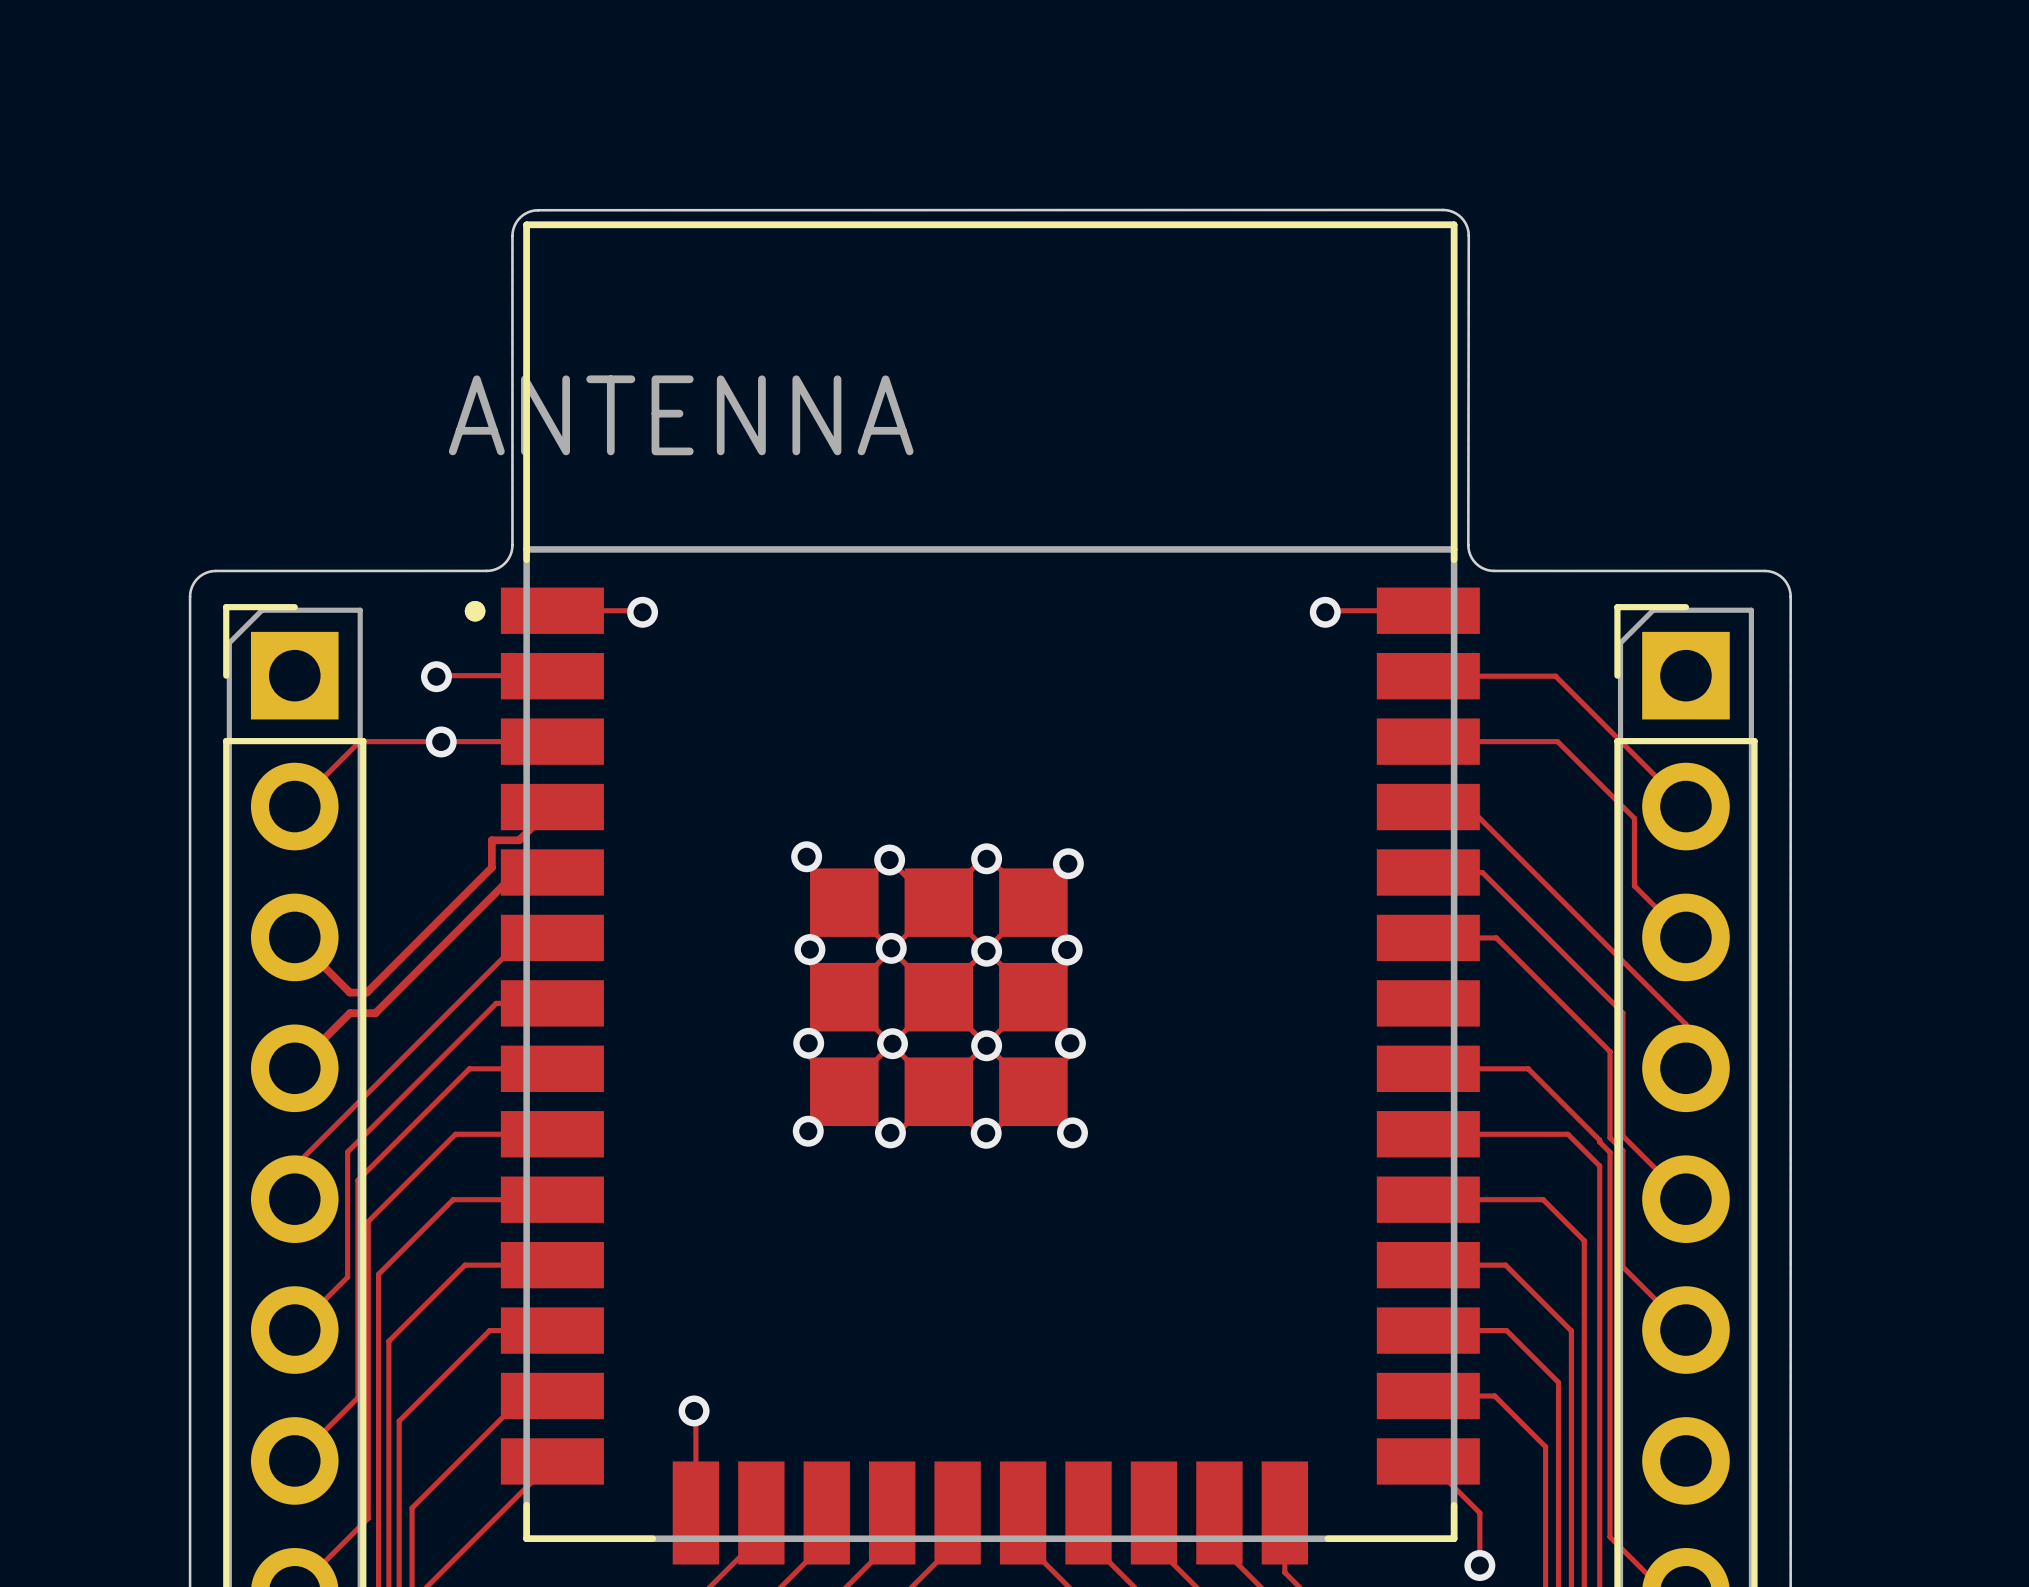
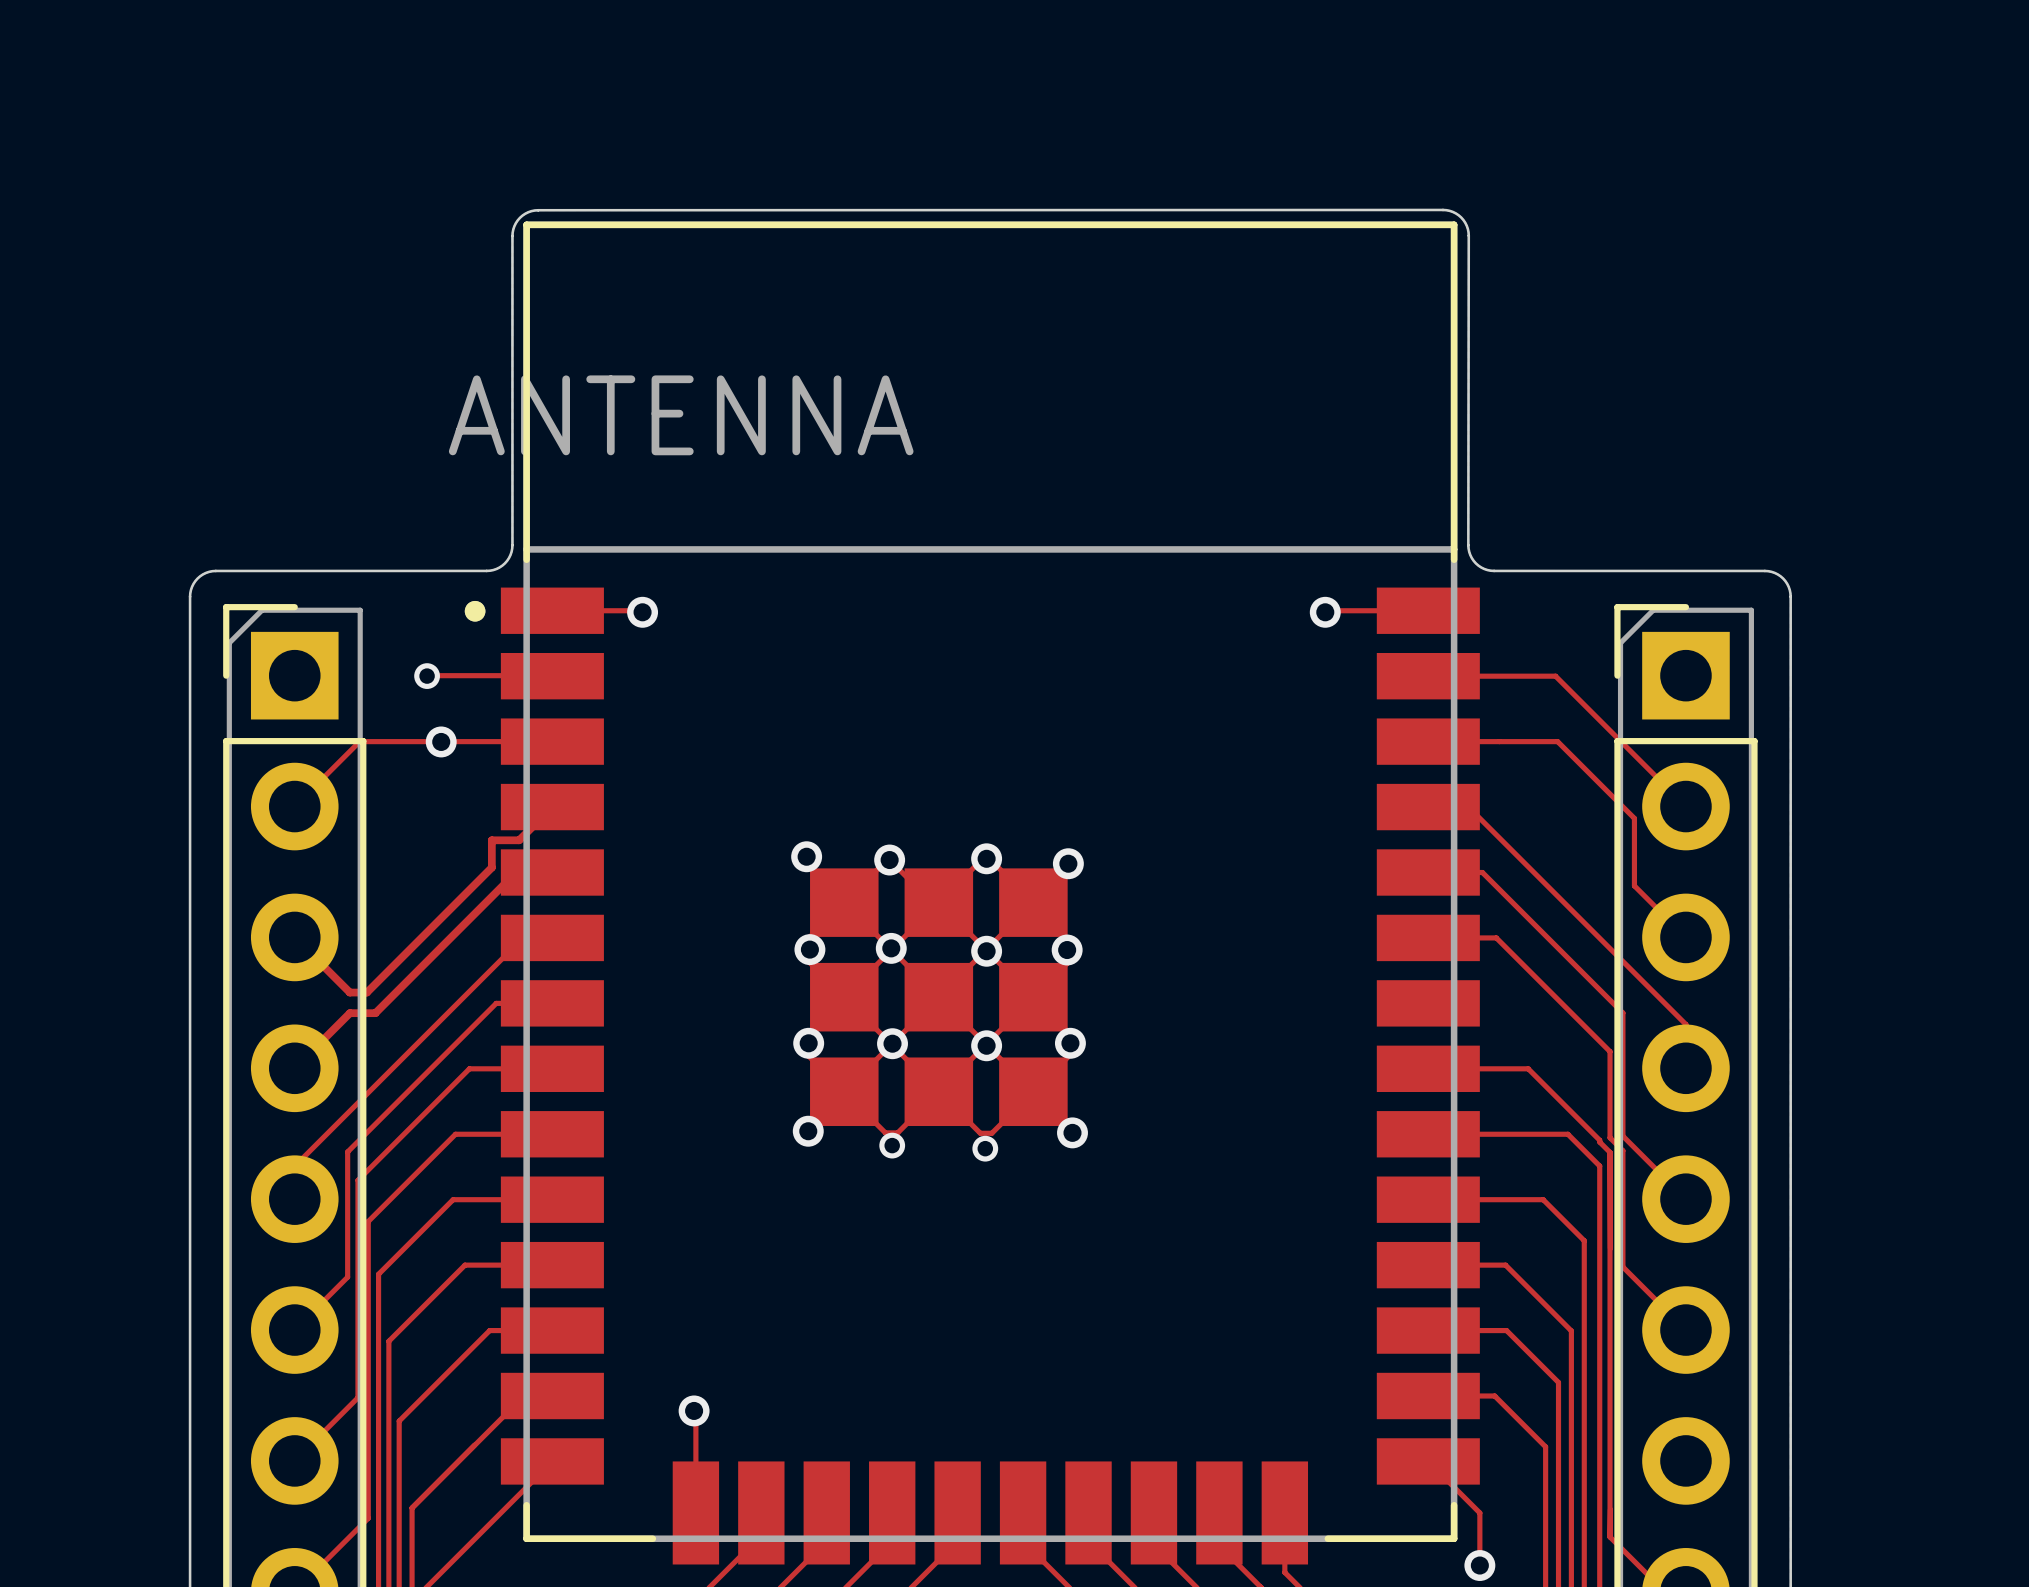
via size: [421, 661, 452, 693] -> [414, 663, 440, 689]
via position: (890, 1132) -> (892, 1145)
via position: (986, 1133) -> (985, 1148)

